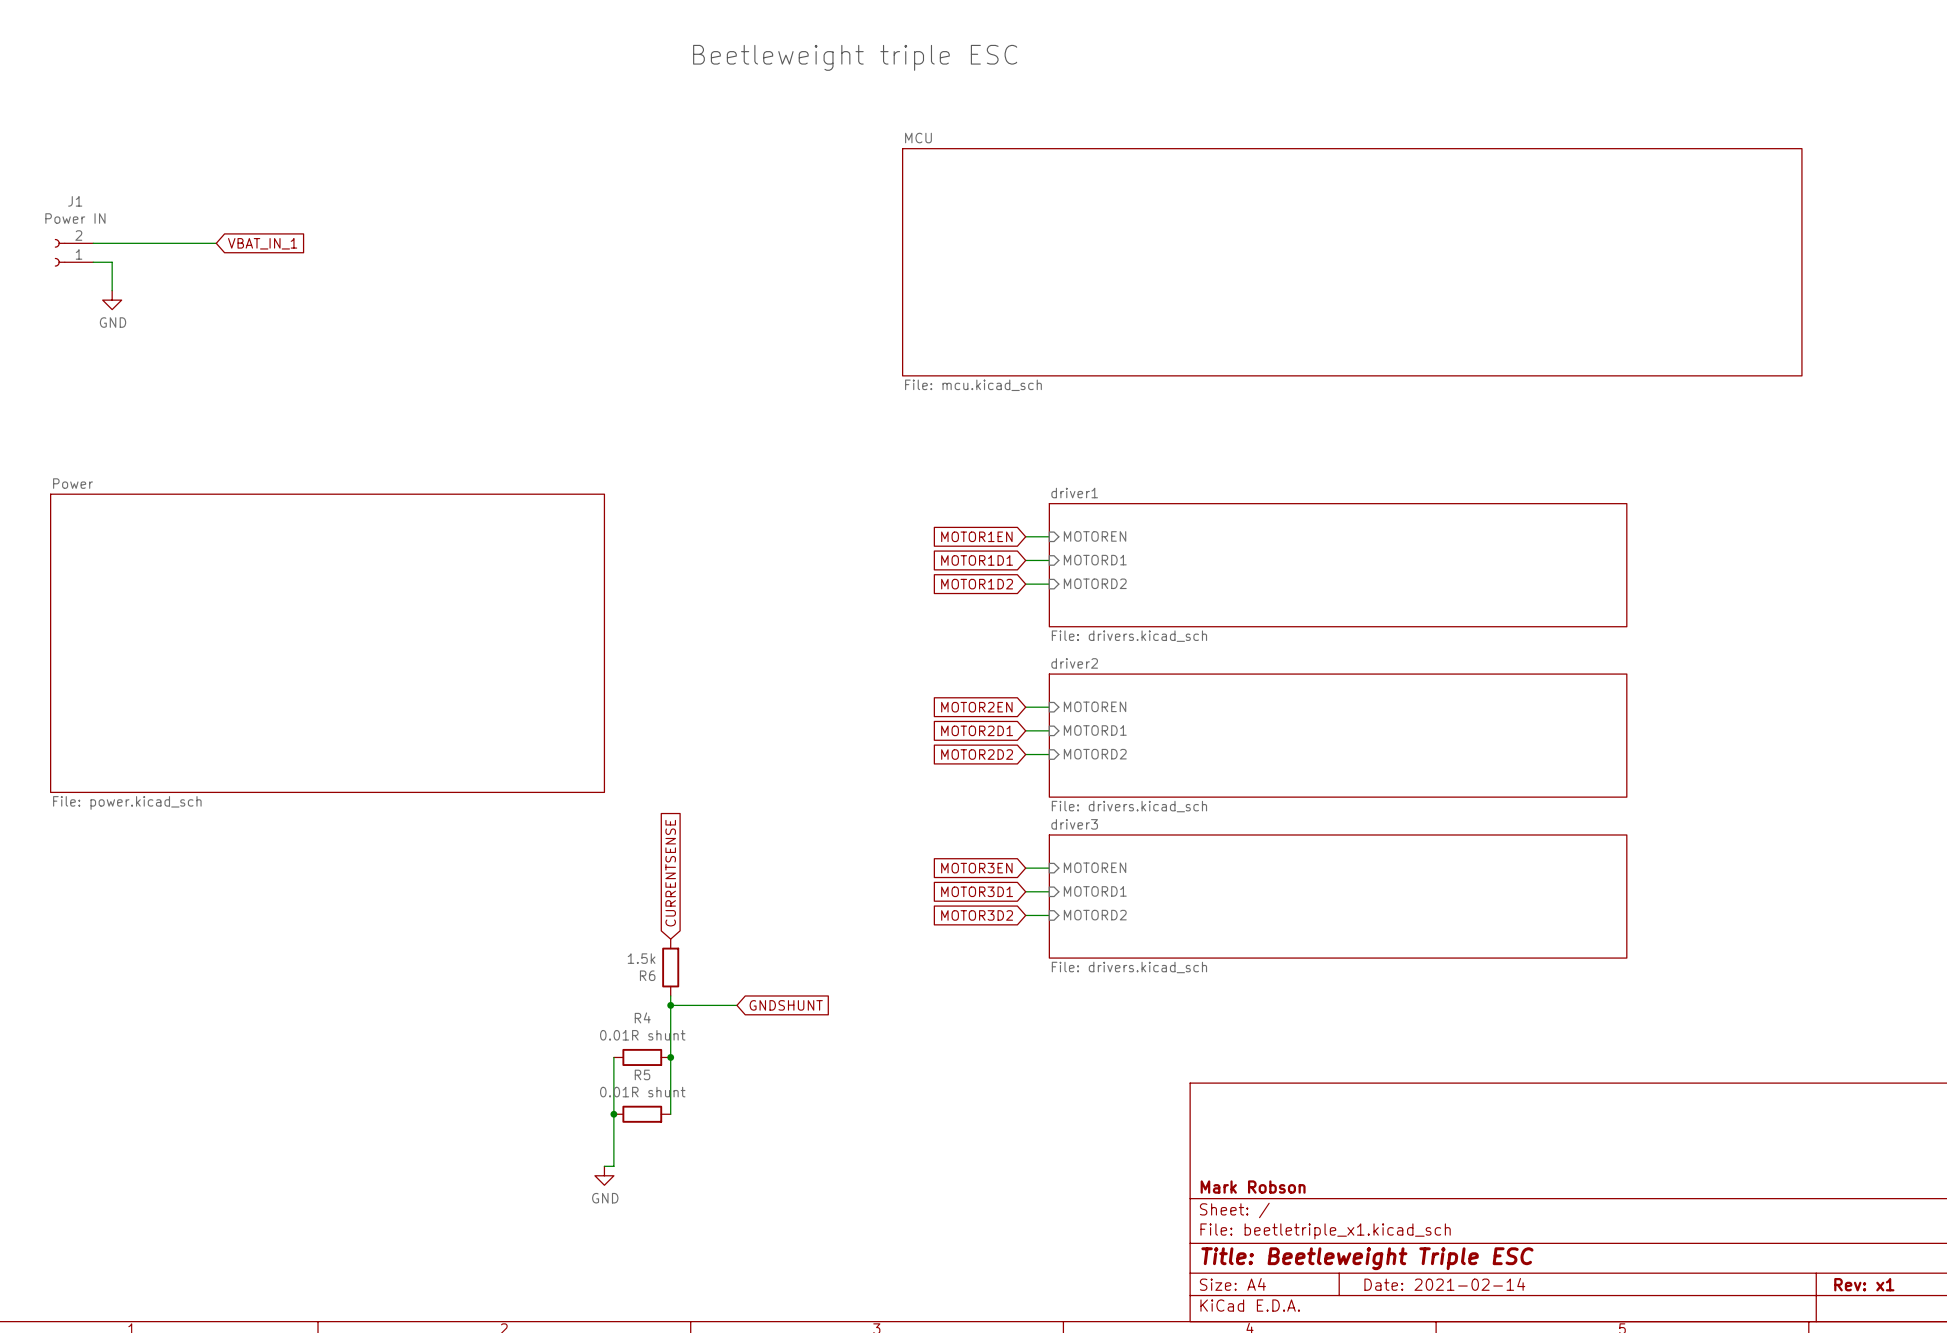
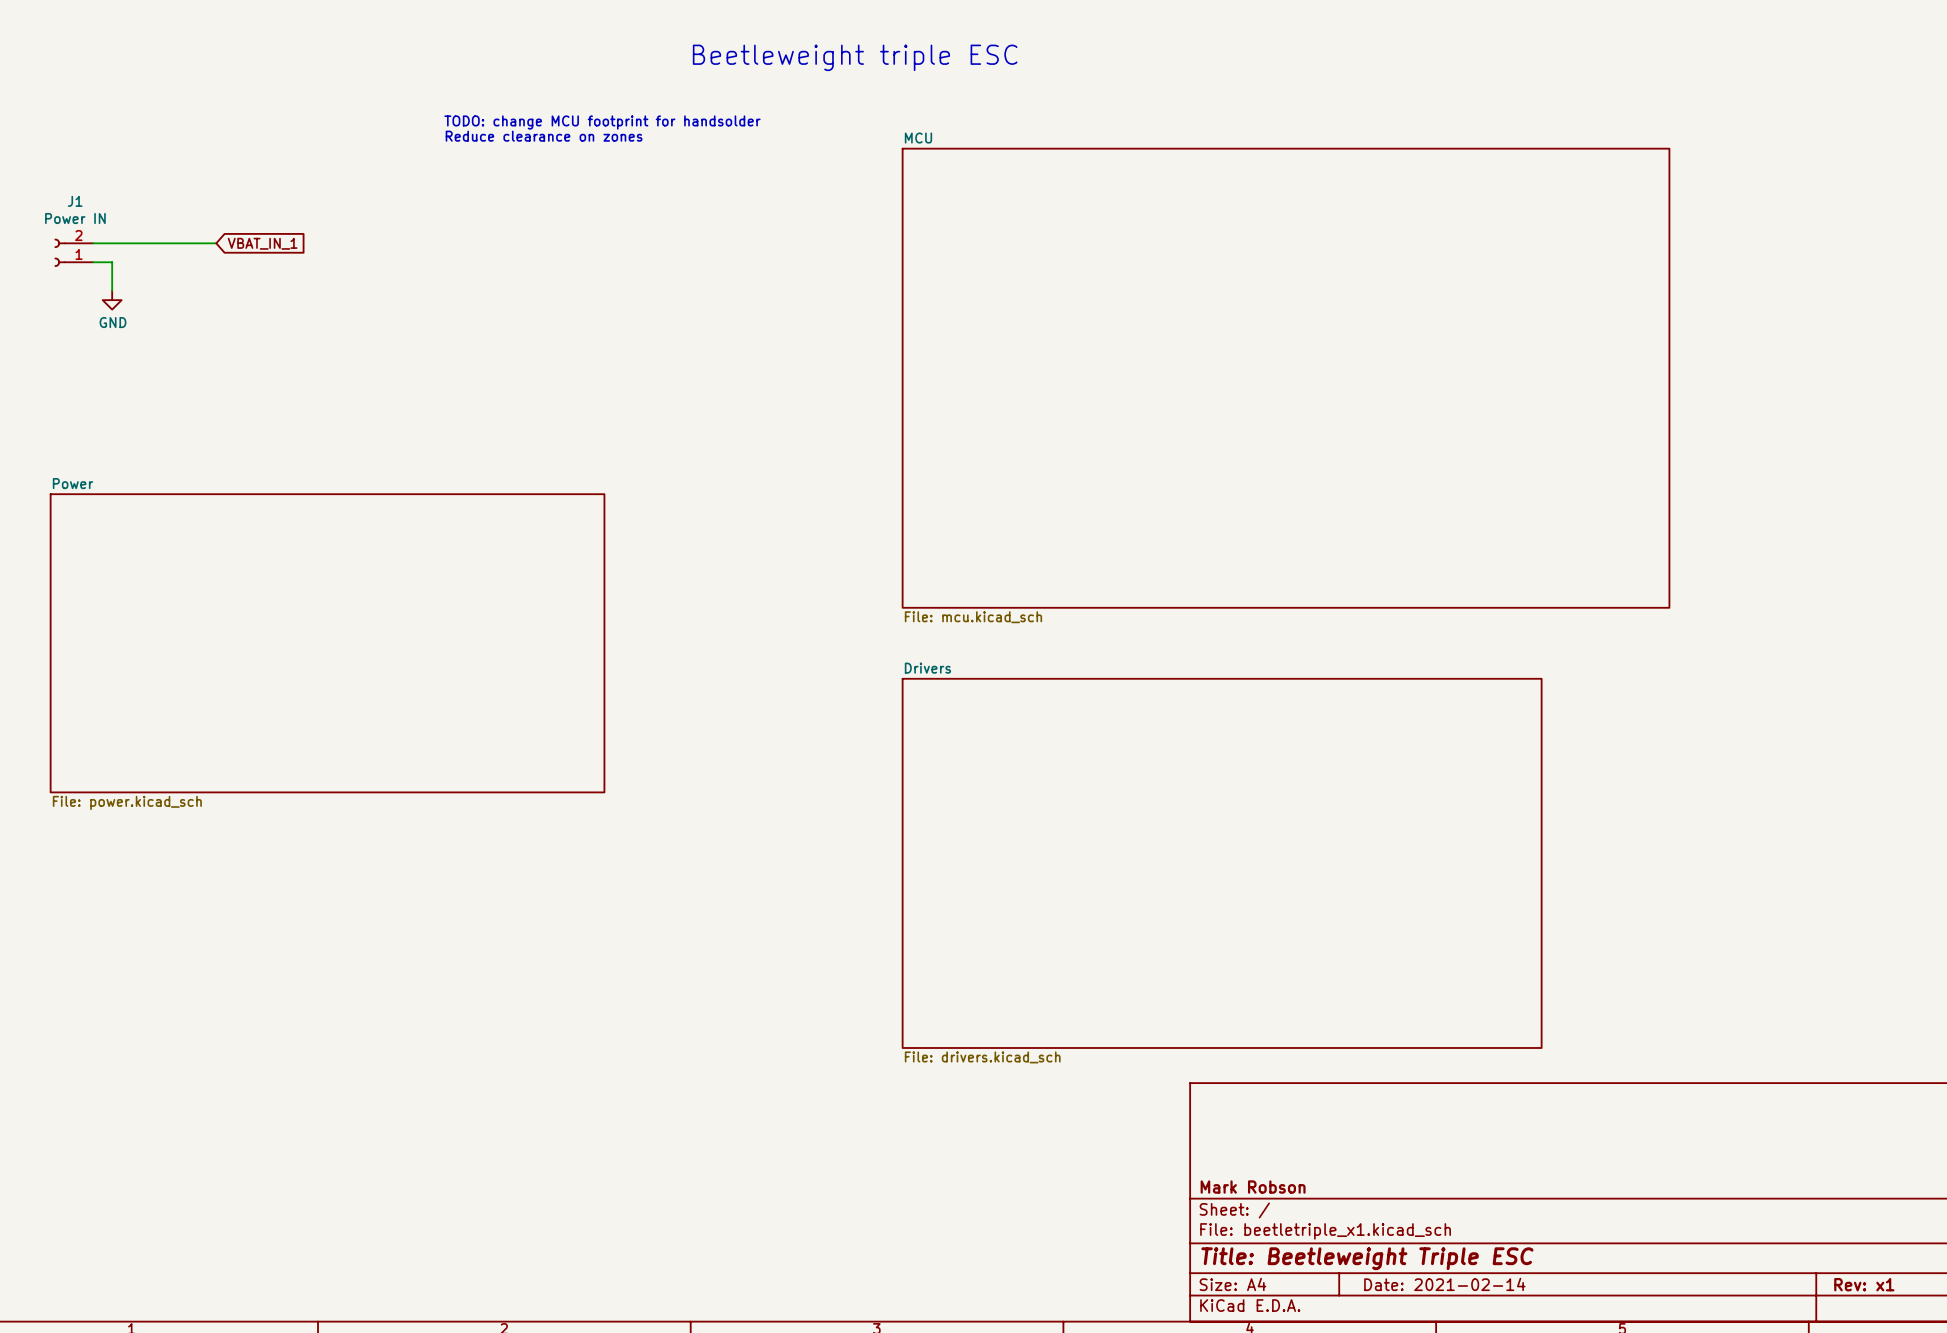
text: none -> TODO: change MCU footprint for handsolder (602, 122)
text: none -> Reduce clearance on zones (544, 136)
sheet MCU: File: mcu.kicad_sch (1352, 262) -> none
sheet MCU: none -> File: mcu.kicad_sch (1286, 378)
global label: MOTOR1EN (976, 536) -> none
wire: (1025, 536) (1049, 536) -> none
sheet pin: MOTOREN (1095, 536) -> none
global label: MOTOR1D1 (977, 560) -> none
wire: (1025, 560) (1049, 560) -> none
sheet pin: MOTORD1 (1095, 560) -> none
sheet driver1: File: drivers.kicad_sch (1338, 565) -> none
sheet pin: MOTORD2 (1095, 583) -> none
global label: MOTOR1D2 (977, 584) -> none
wire: (1025, 584) (1049, 584) -> none
sheet pin: MOTOREN (1095, 706) -> none
global label: MOTOR2EN (976, 707) -> none
wire: (1025, 707) (1049, 707) -> none
global label: MOTOR2D1 (977, 730) -> none
wire: (1025, 730) (1049, 730) -> none
sheet pin: MOTORD1 (1095, 730) -> none
sheet driver2: File: drivers.kicad_sch (1338, 735) -> none
global label: MOTOR2D2 (977, 754) -> none
wire: (1025, 754) (1049, 754) -> none
sheet pin: MOTORD2 (1095, 754) -> none
sheet Drivers: none -> File: drivers.kicad_sch (1222, 863)
sheet pin: MOTOREN (1095, 867) -> none
global label: MOTOR3EN (976, 868) -> none
wire: (1025, 868) (1049, 868) -> none
global label: CURRENTSENSE (670, 873) -> none
global label: MOTOR3D1 (977, 891) -> none
wire: (1025, 891) (1049, 891) -> none
sheet pin: MOTORD1 (1095, 891) -> none
sheet driver3: File: drivers.kicad_sch (1338, 896) -> none
global label: MOTOR3D2 (977, 915) -> none
wire: (1025, 915) (1049, 915) -> none
sheet pin: MOTORD2 (1095, 915) -> none
R6: 1.5k (670, 967) -> none
wire: (670, 995) (670, 1114) -> none
wire: (670, 1005) (736, 1005) -> none
junction: (670, 1005) -> none
global label: GNDSHUNT (786, 1005) -> none
wire: (613, 1057) (613, 1166) (604, 1166) -> none
R4: 0.01R shunt (642, 1057) -> none
junction: (670, 1057) -> none
junction: (613, 1114) -> none
R5: 0.01R shunt (642, 1114) -> none
power symbol: GND (604, 1175) -> none

